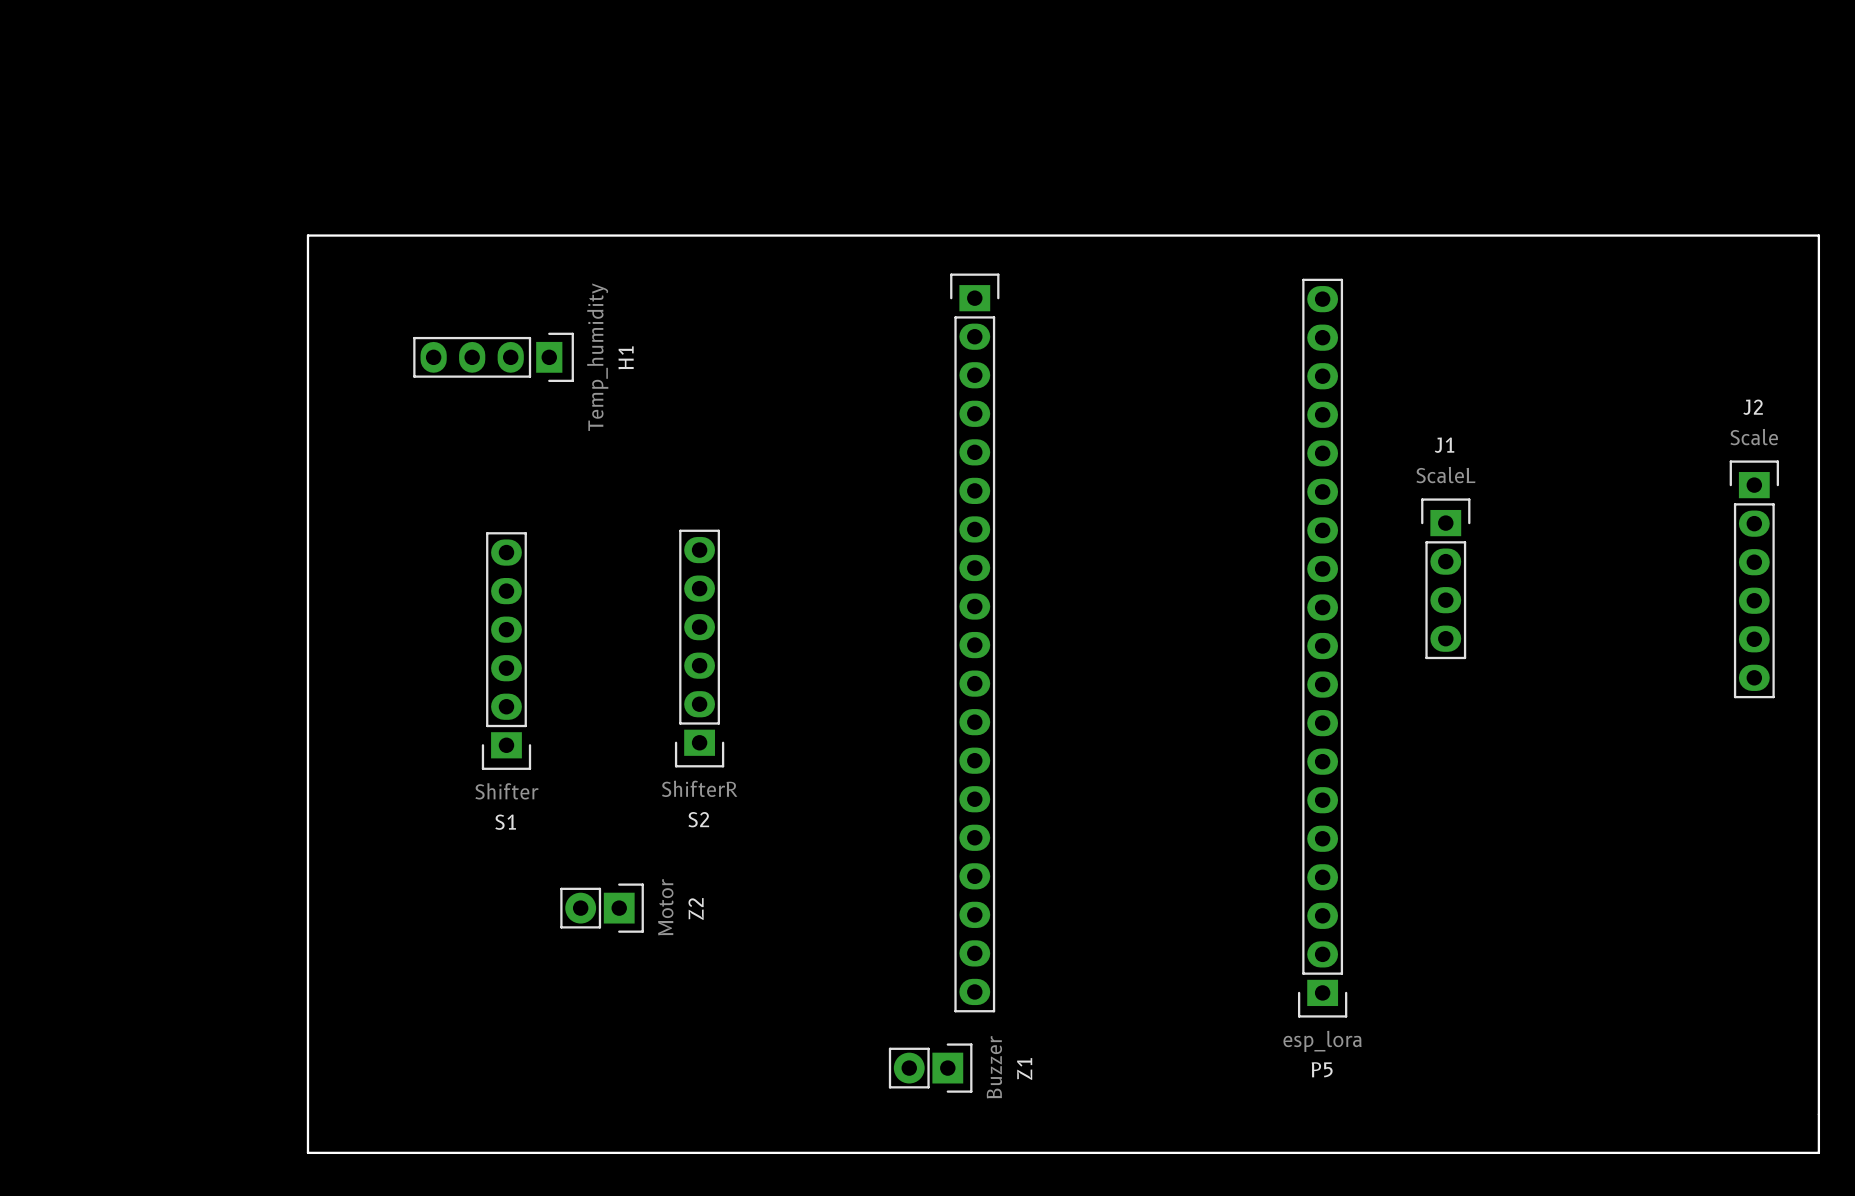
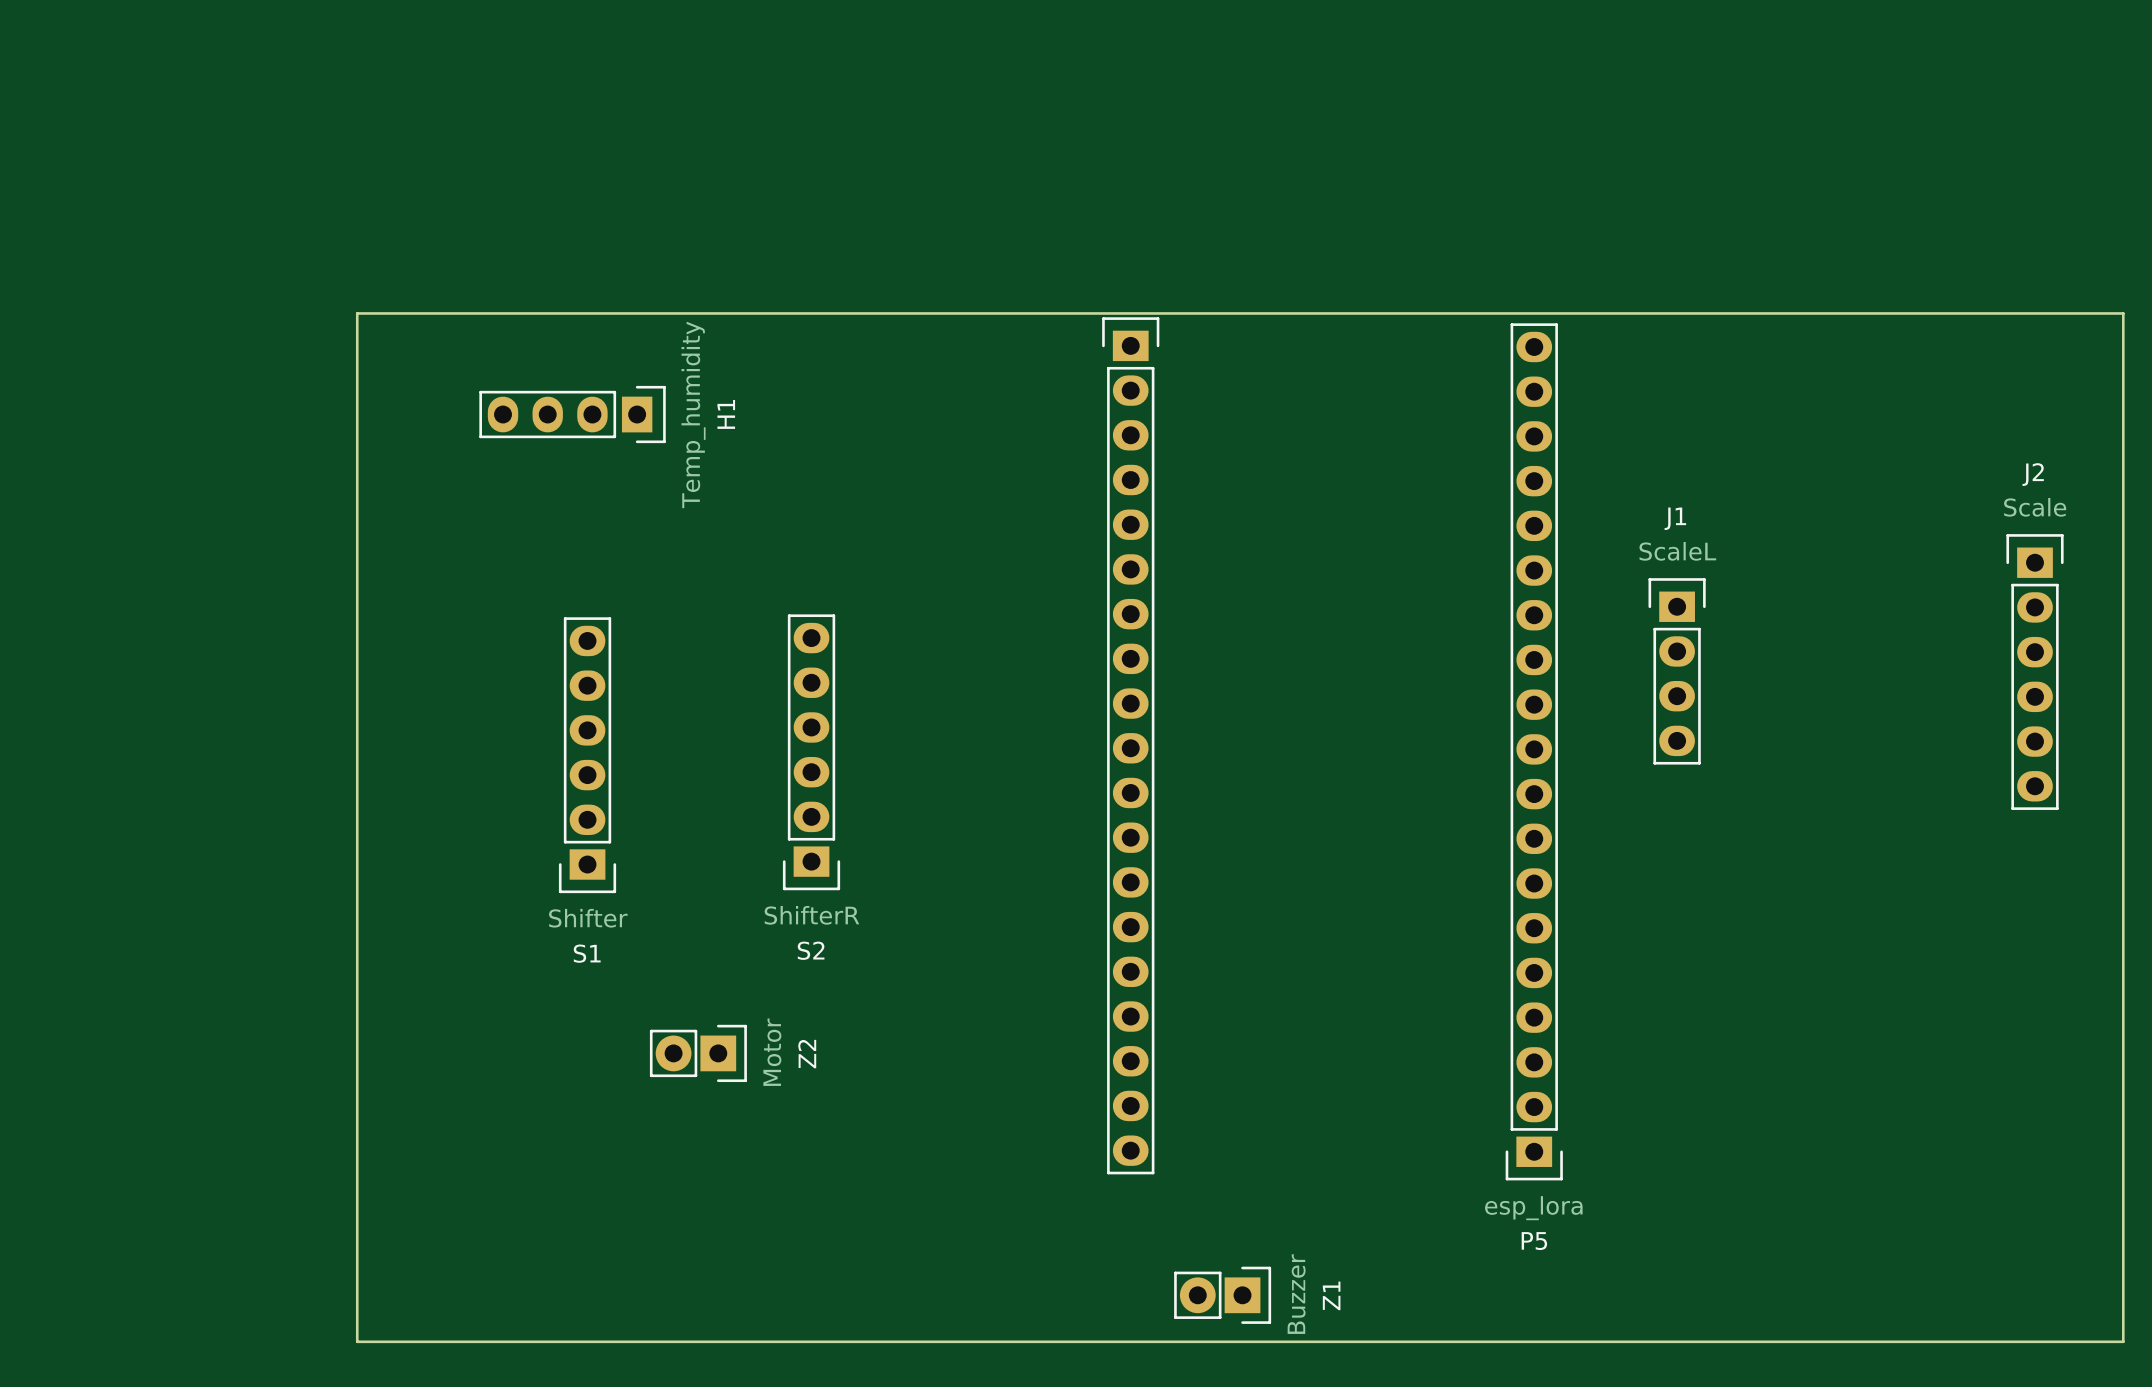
board edge: (307, 270) (307, 235) (1818, 235) (1818, 1152) (307, 1152) -> (357, 313) (2123, 313) (2123, 1341) (357, 1341) (357, 1337)
Z1 position: (930, 1068) -> (1222, 1295)

